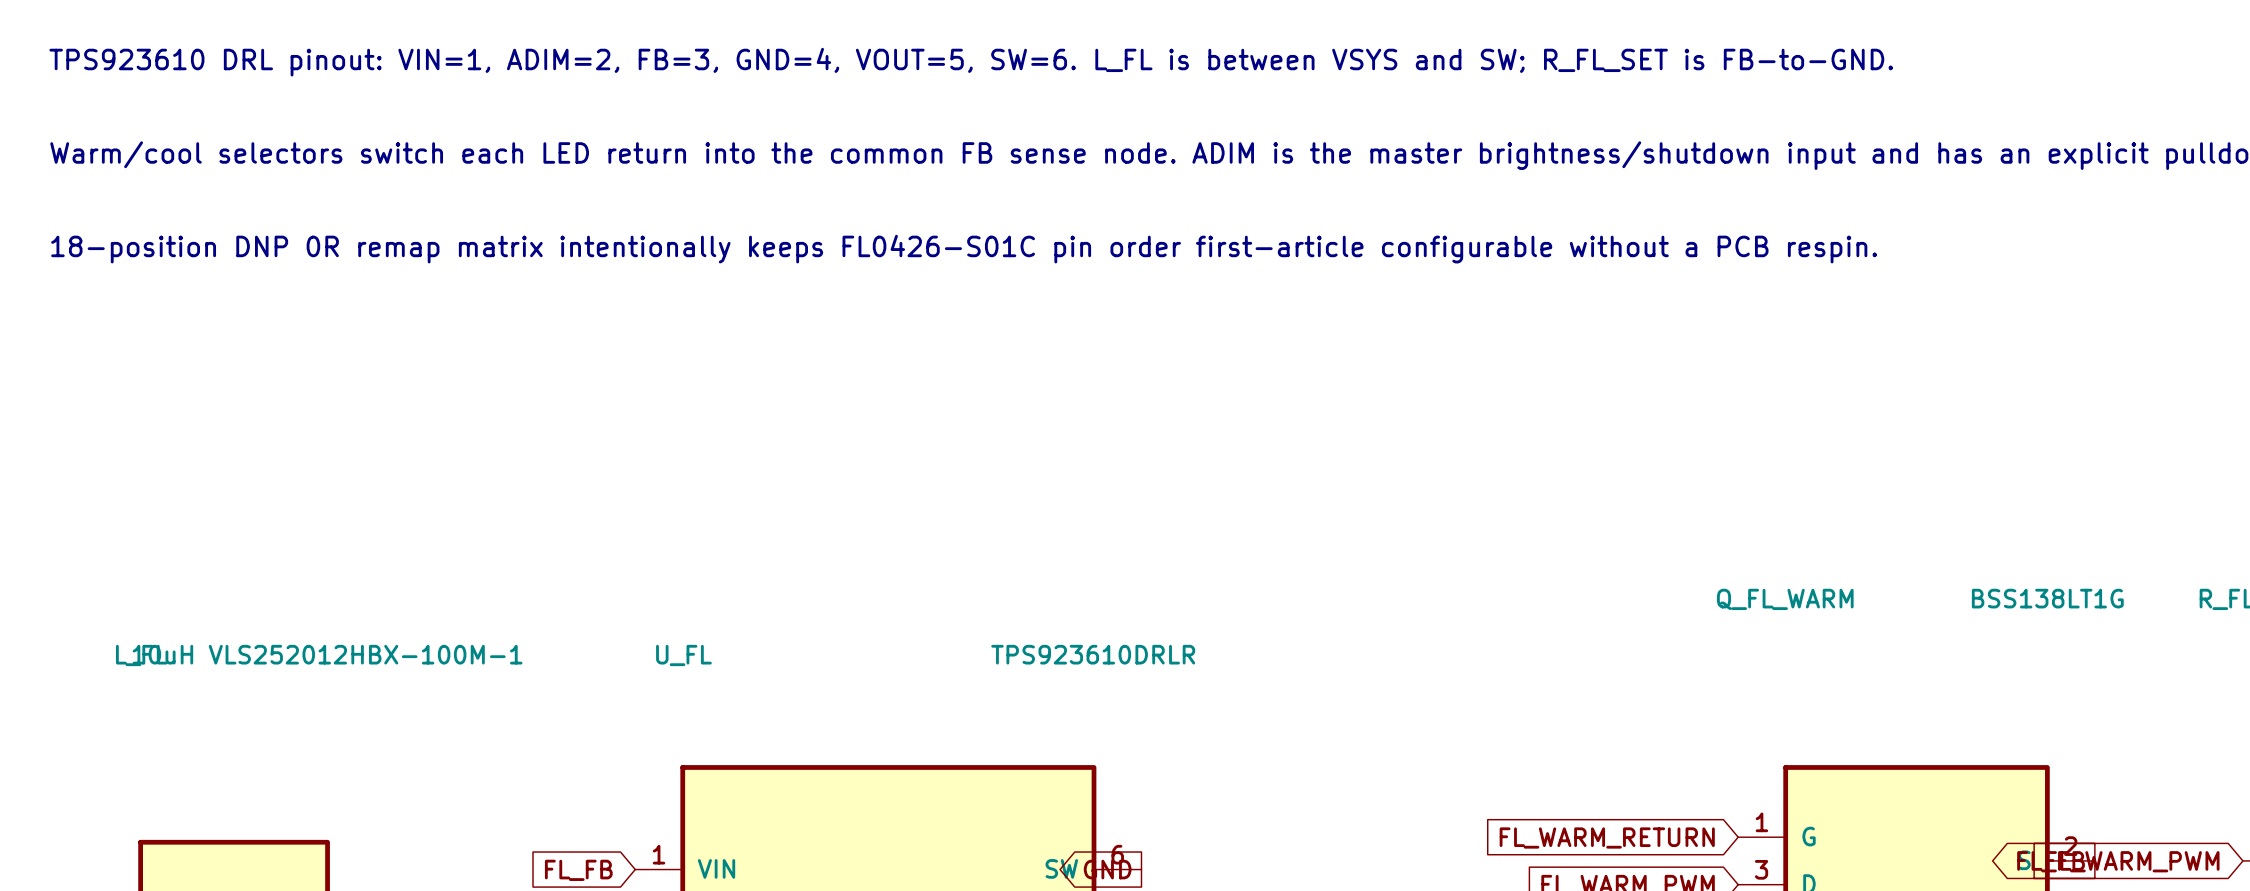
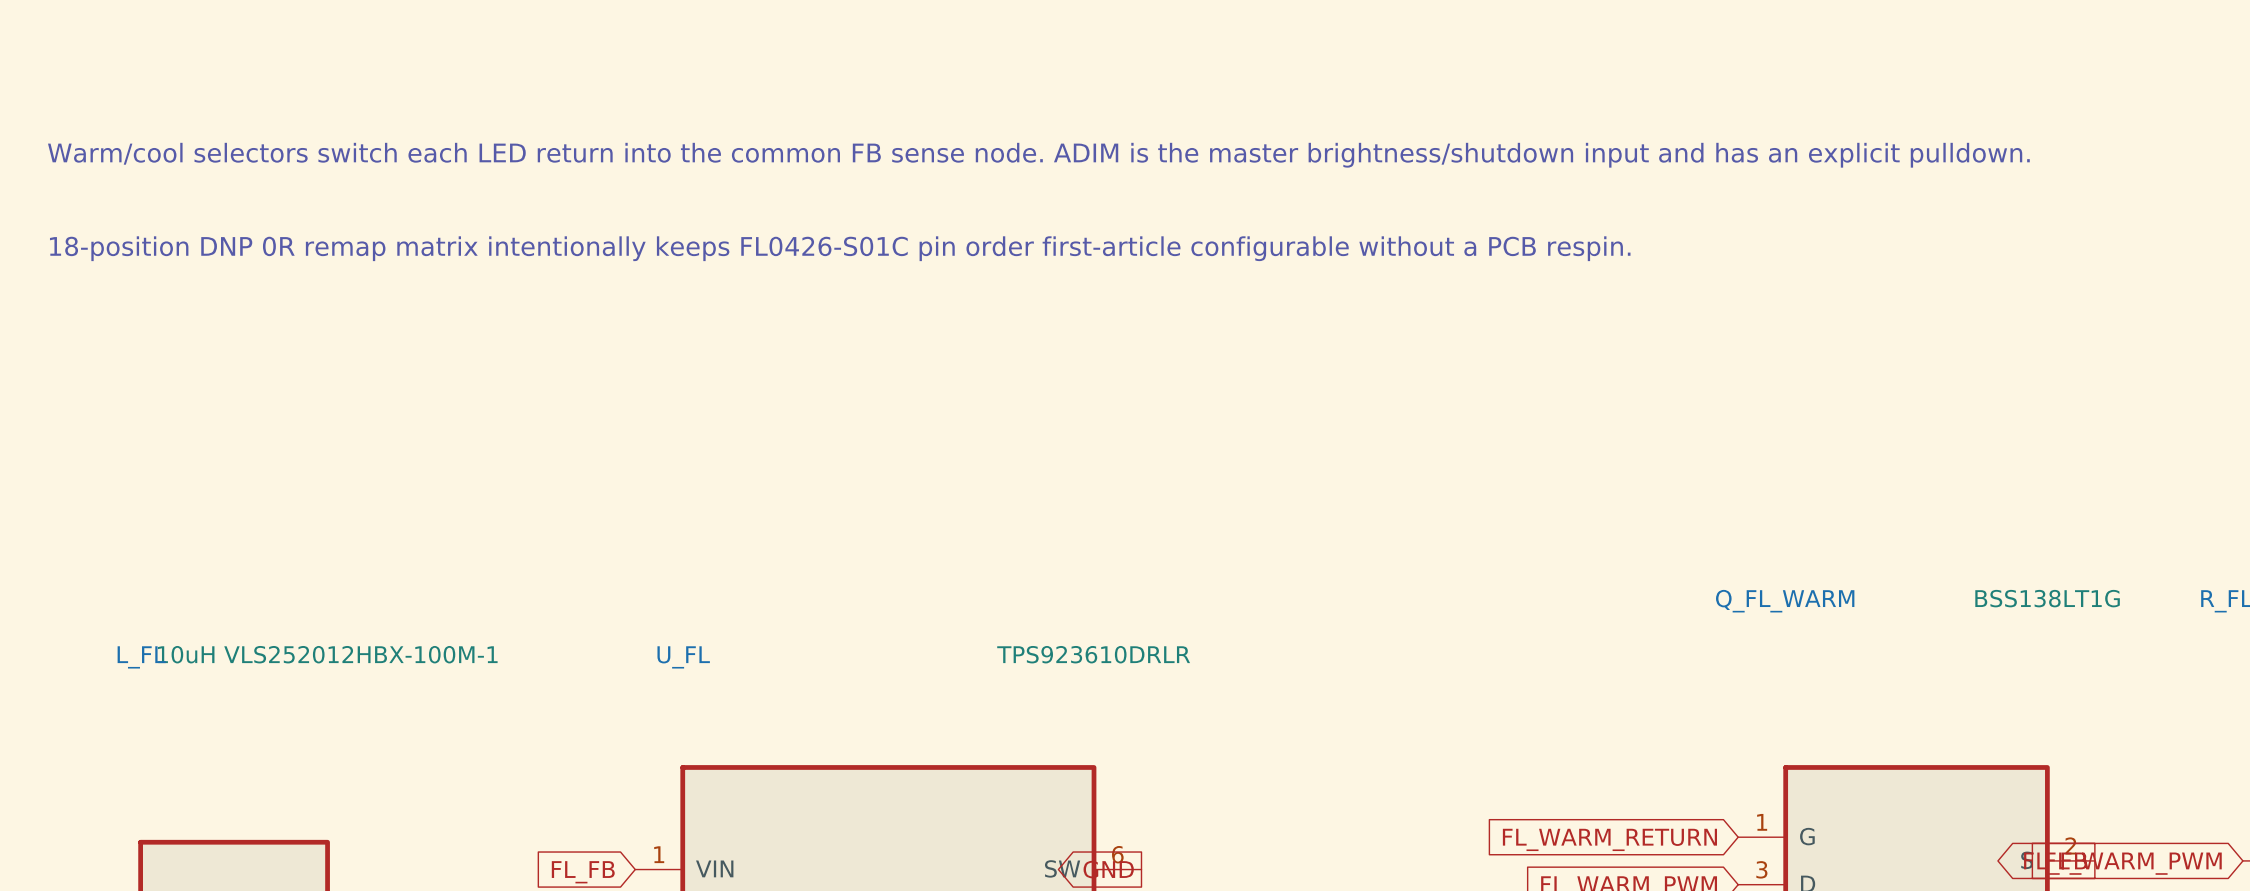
text: TPS923610 DRL pinout: VIN=1, ADIM=2, FB=3, GND=4, VOUT=5, SW=6. L_FL is between VSYS and SW; R_FL_SET is FB-to-GND. (971, 62) -> none

